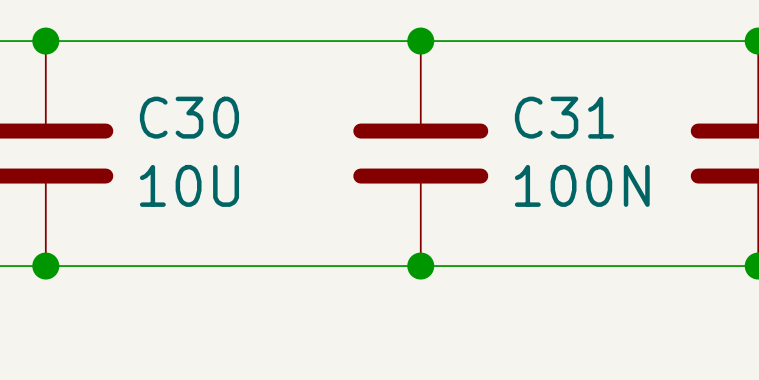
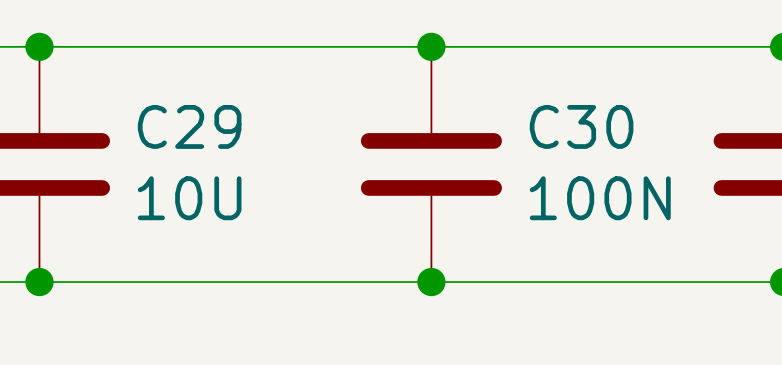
C30 name: C30 (189, 117) -> C29 (189, 126)
C31 name: C31 (564, 117) -> C30 (581, 126)

